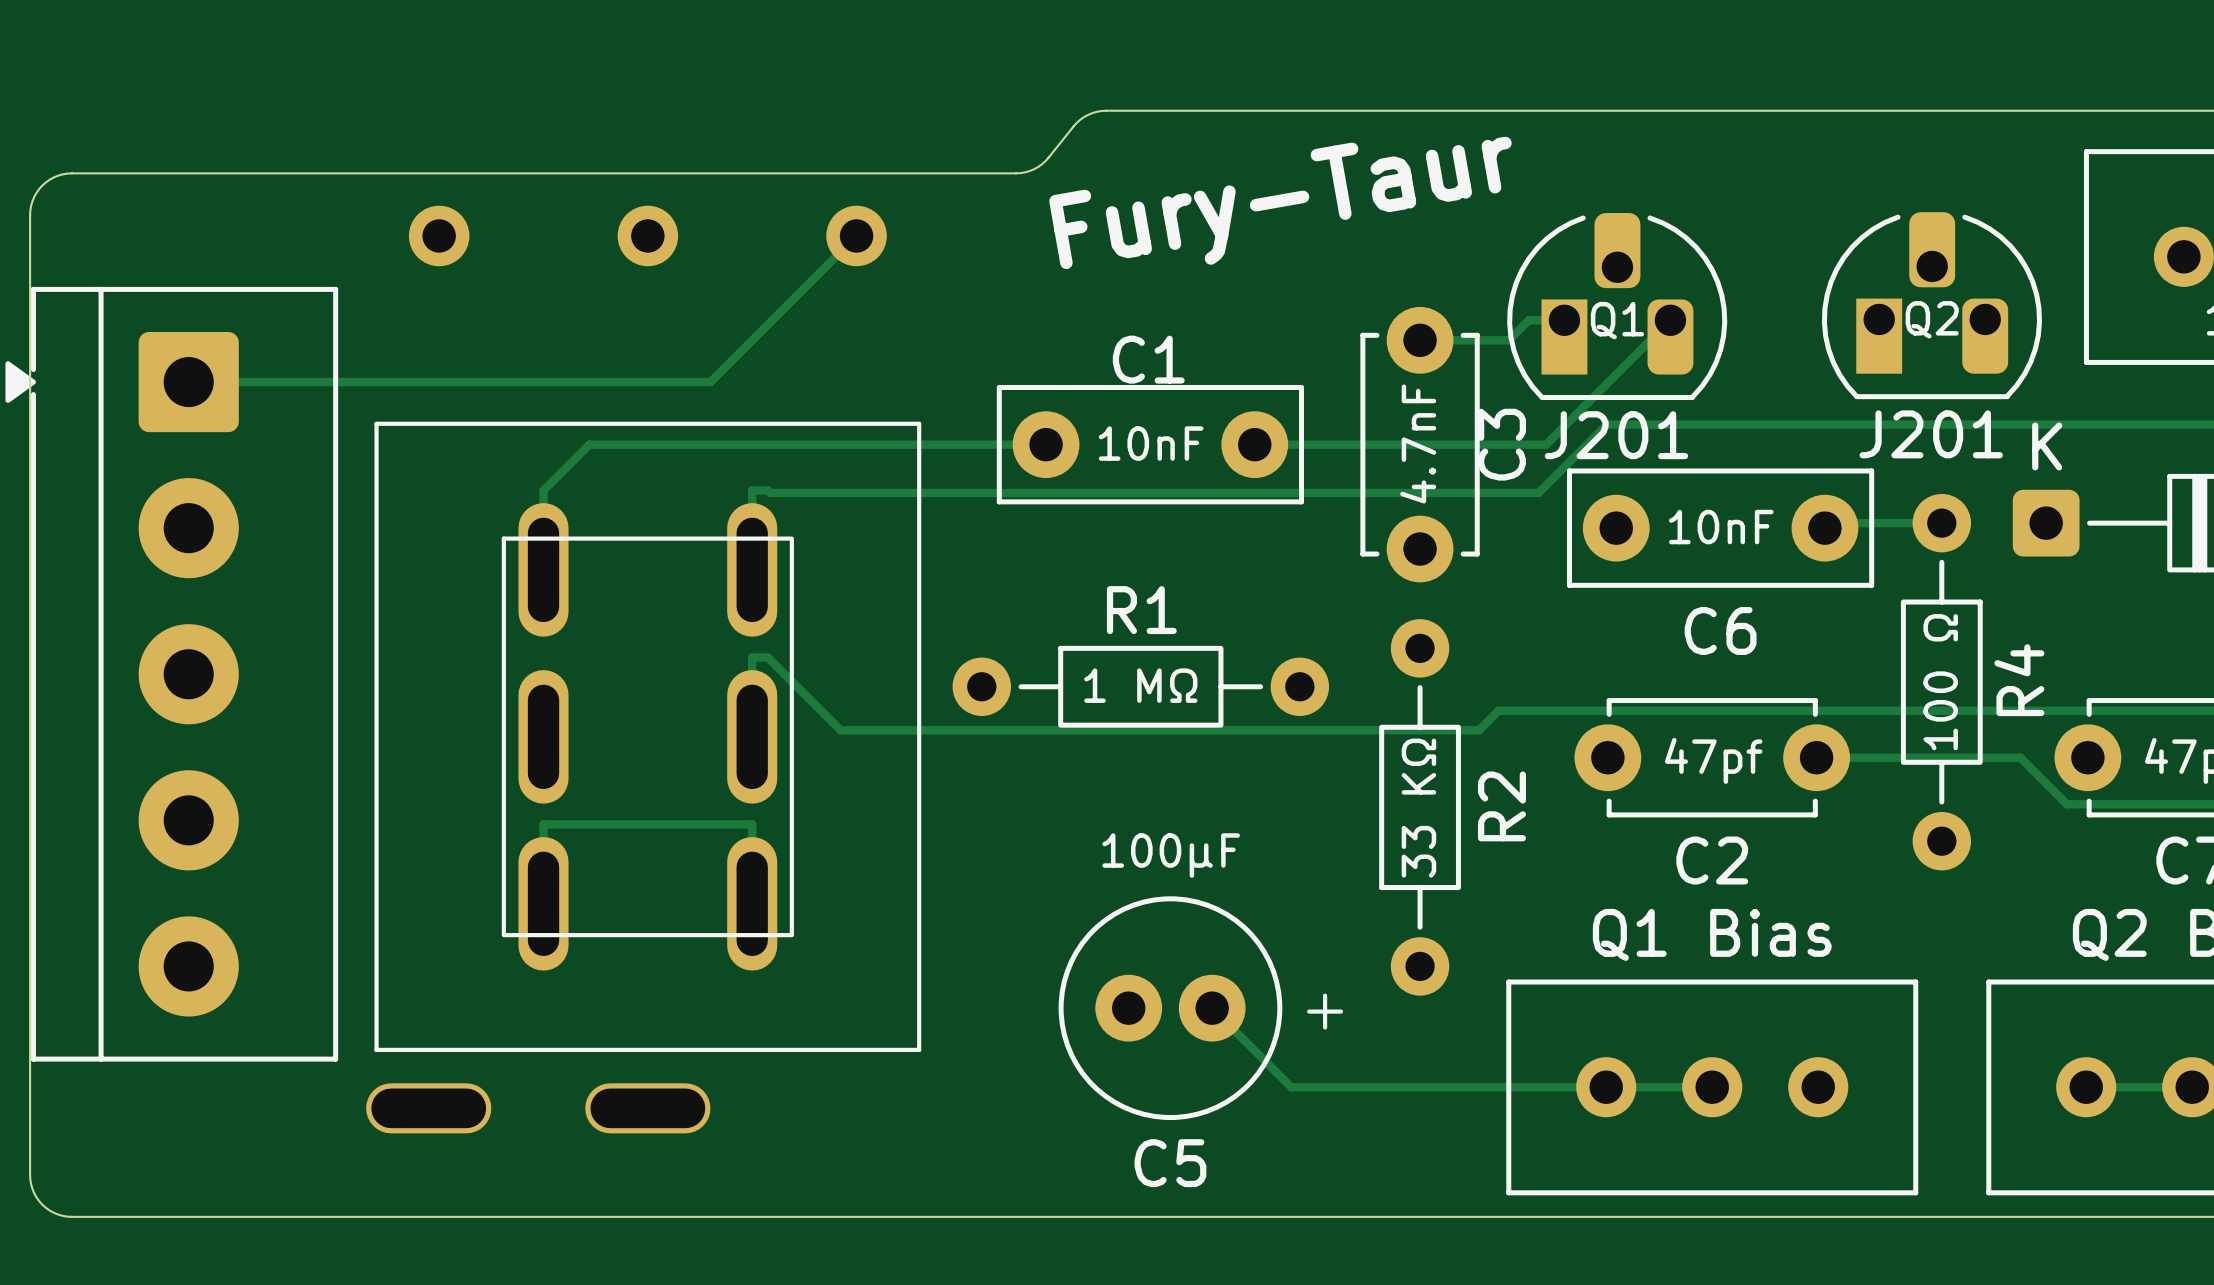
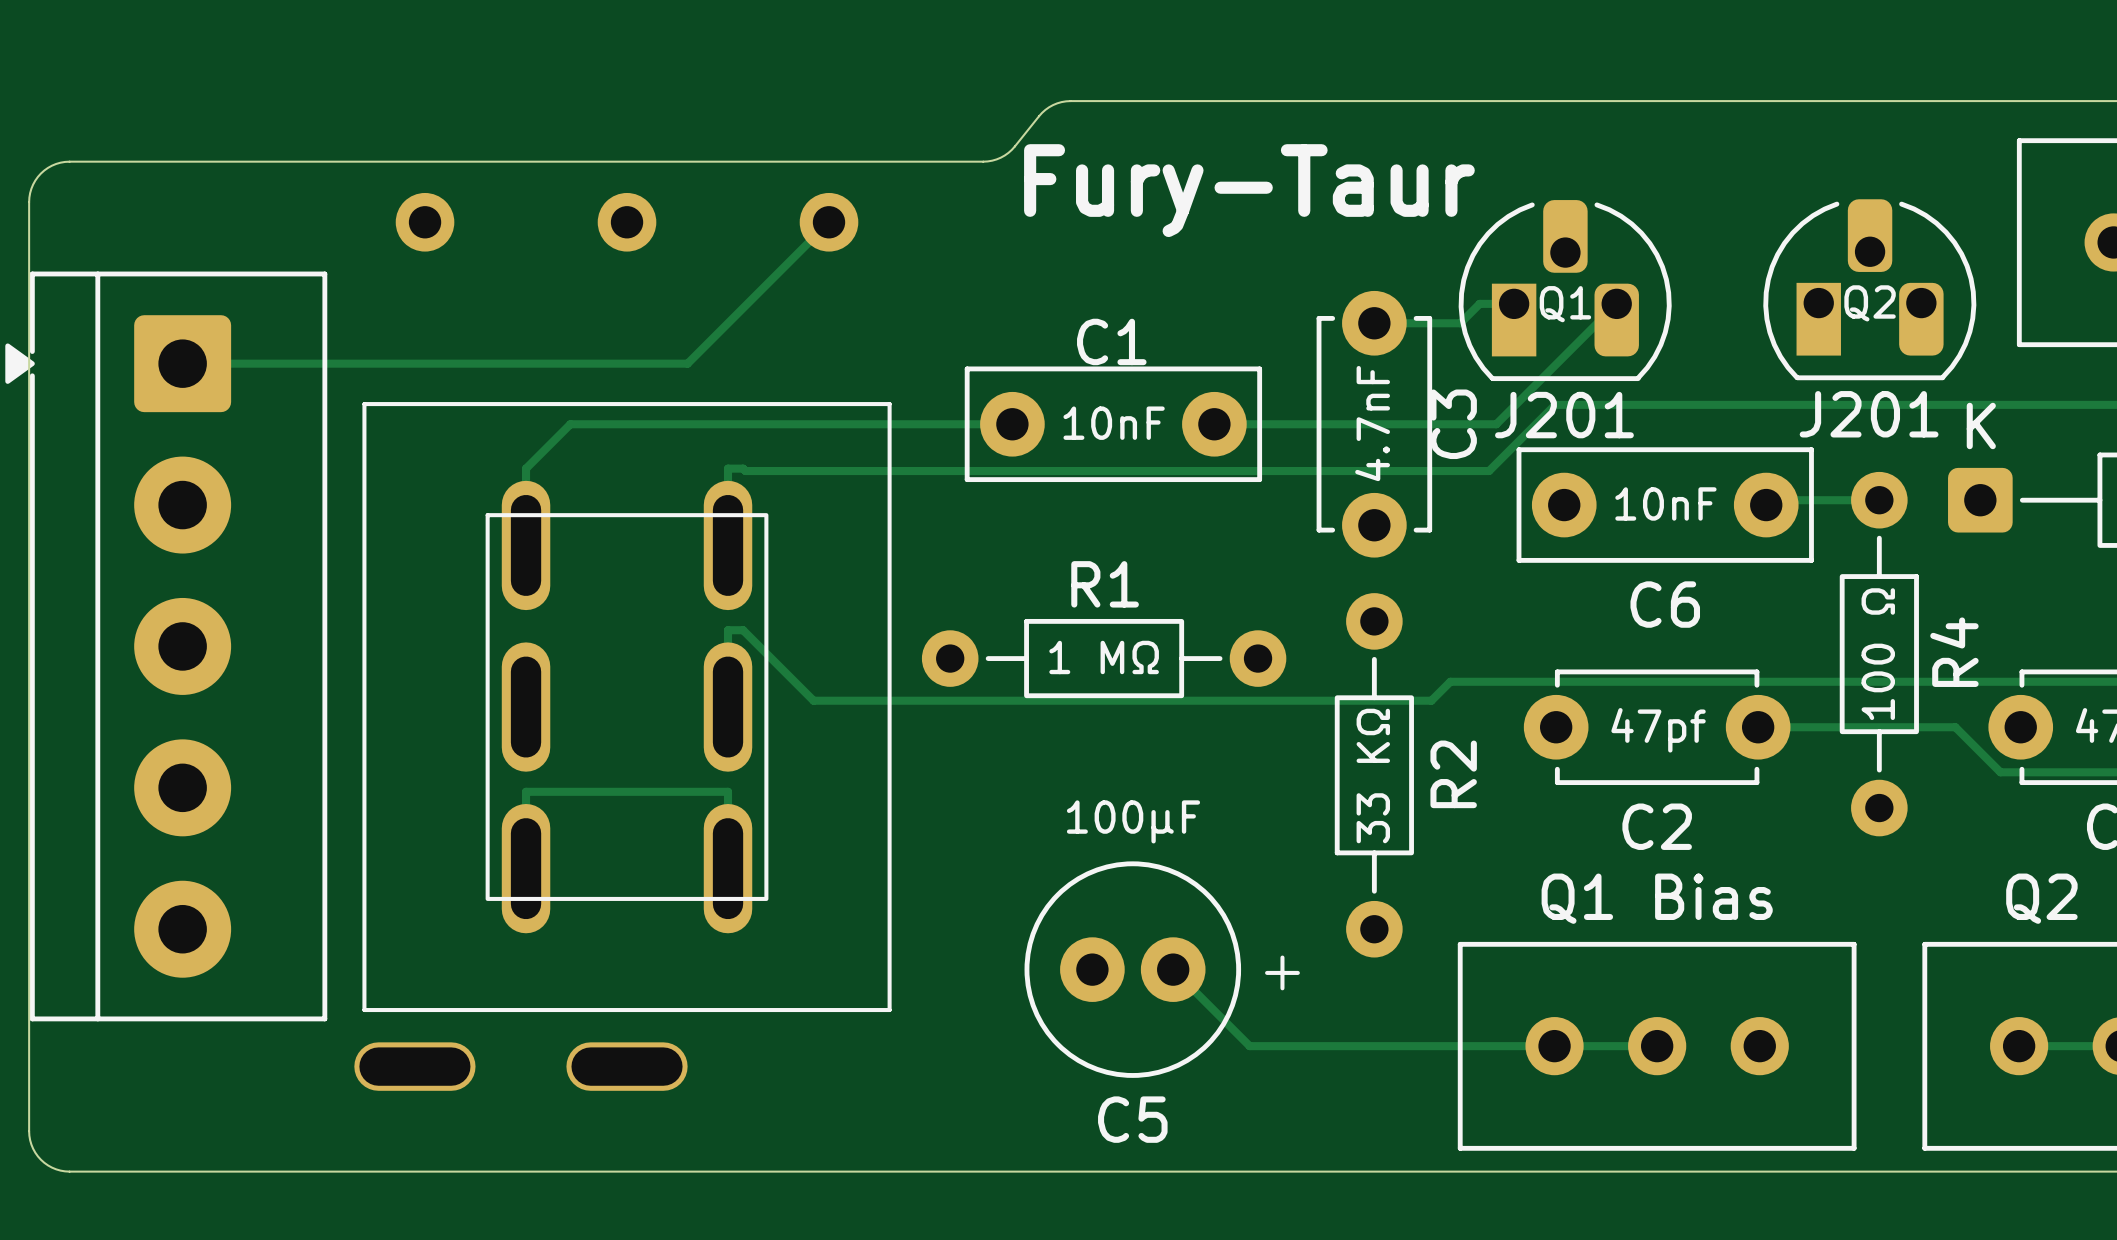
text rotation: 0° (1280, 202) -> 10° clockwise (1249, 190)

